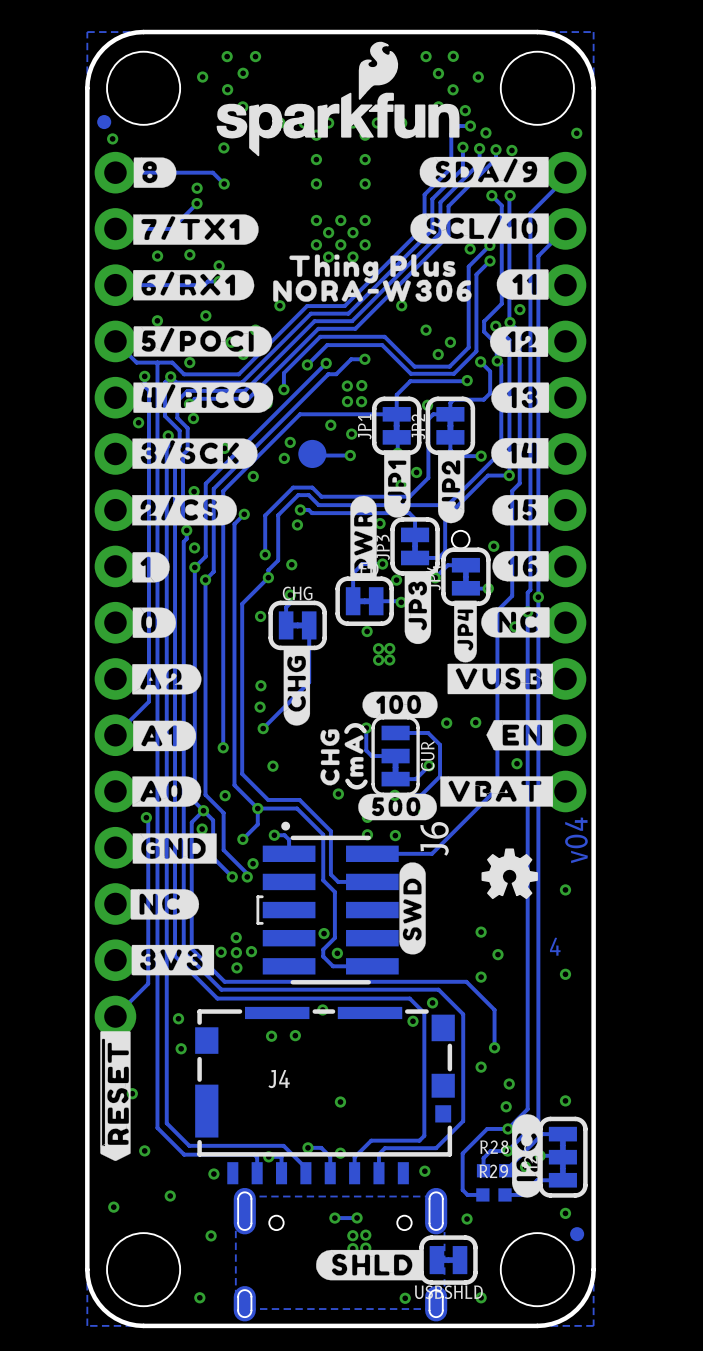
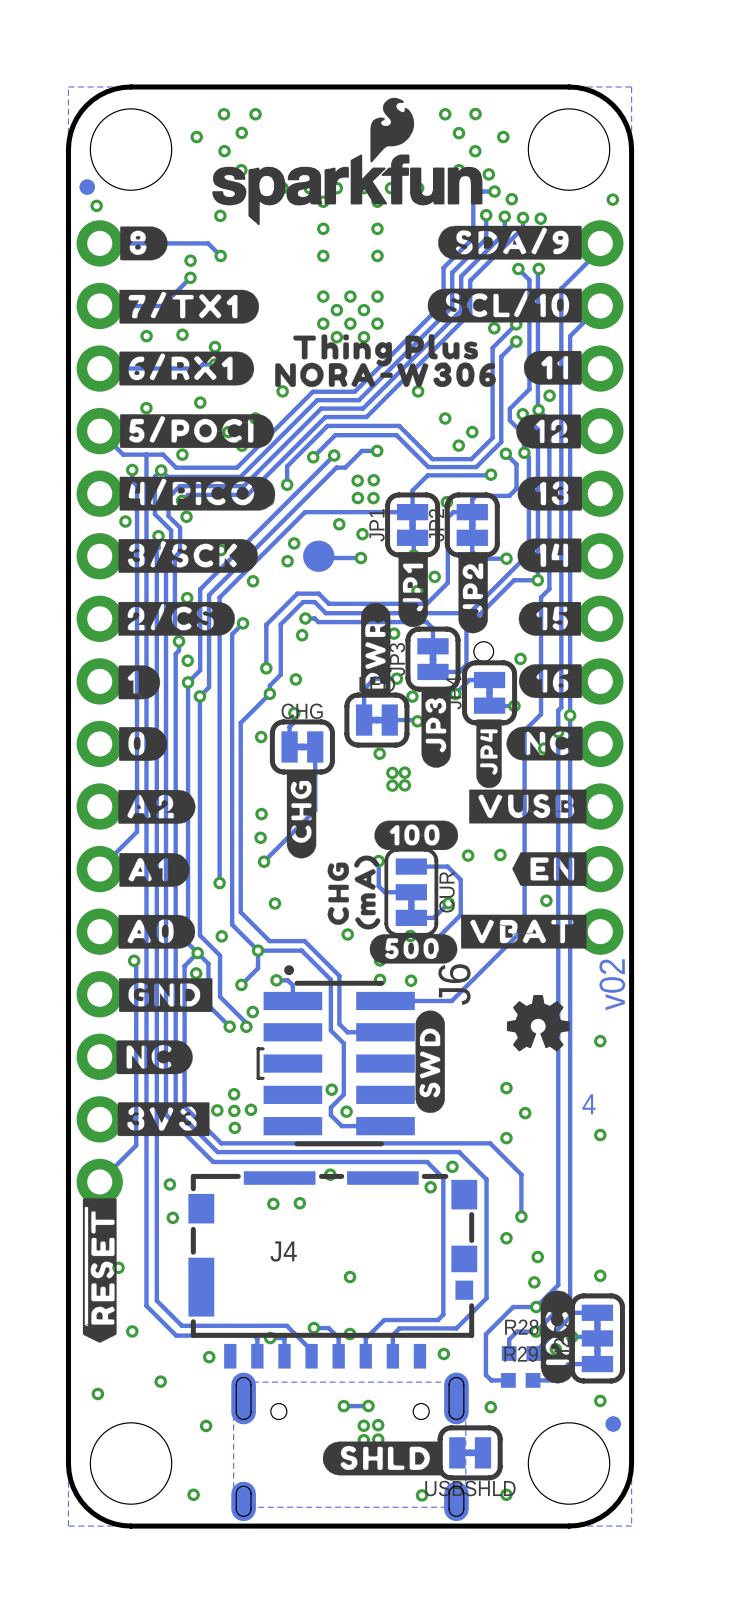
text: v04 (576, 840) -> v02 (612, 984)

